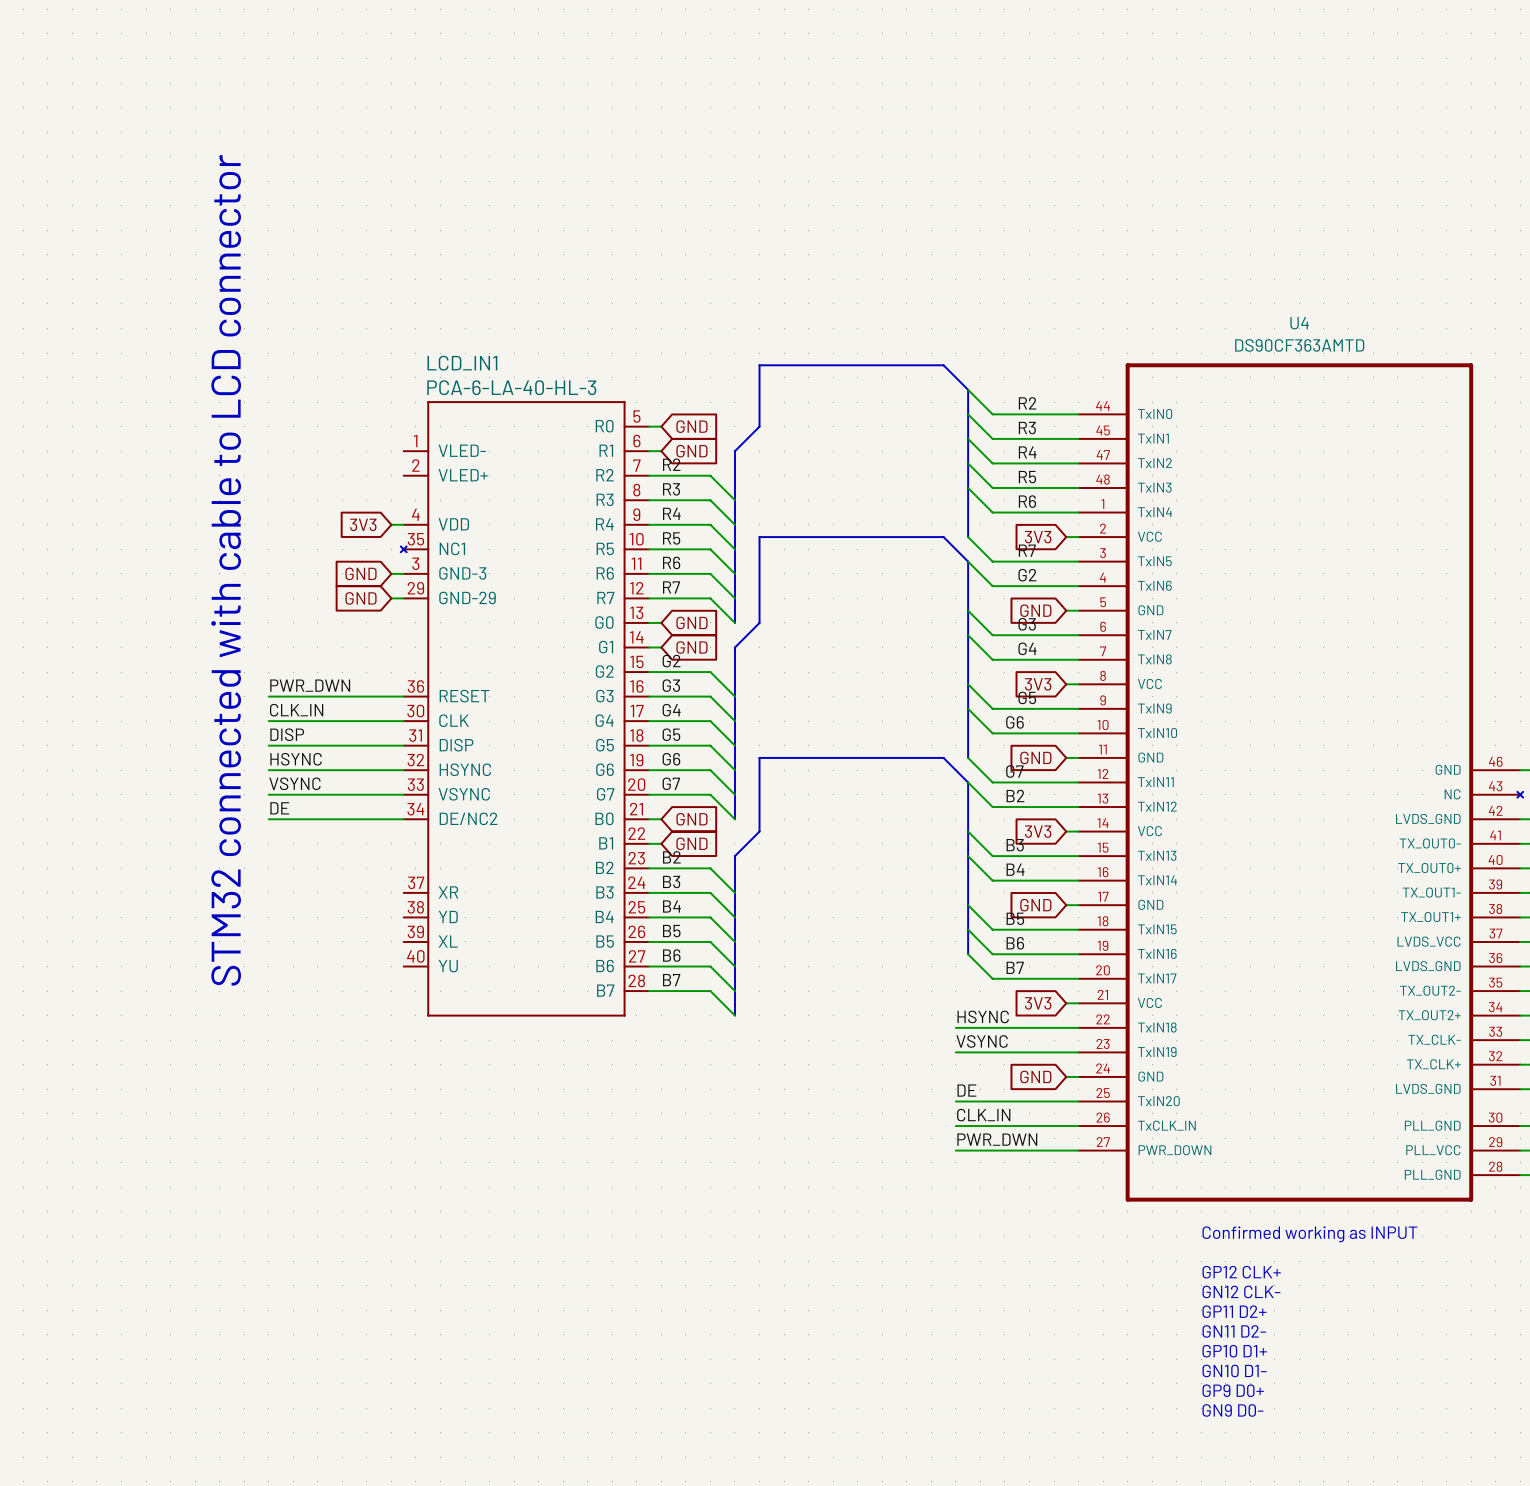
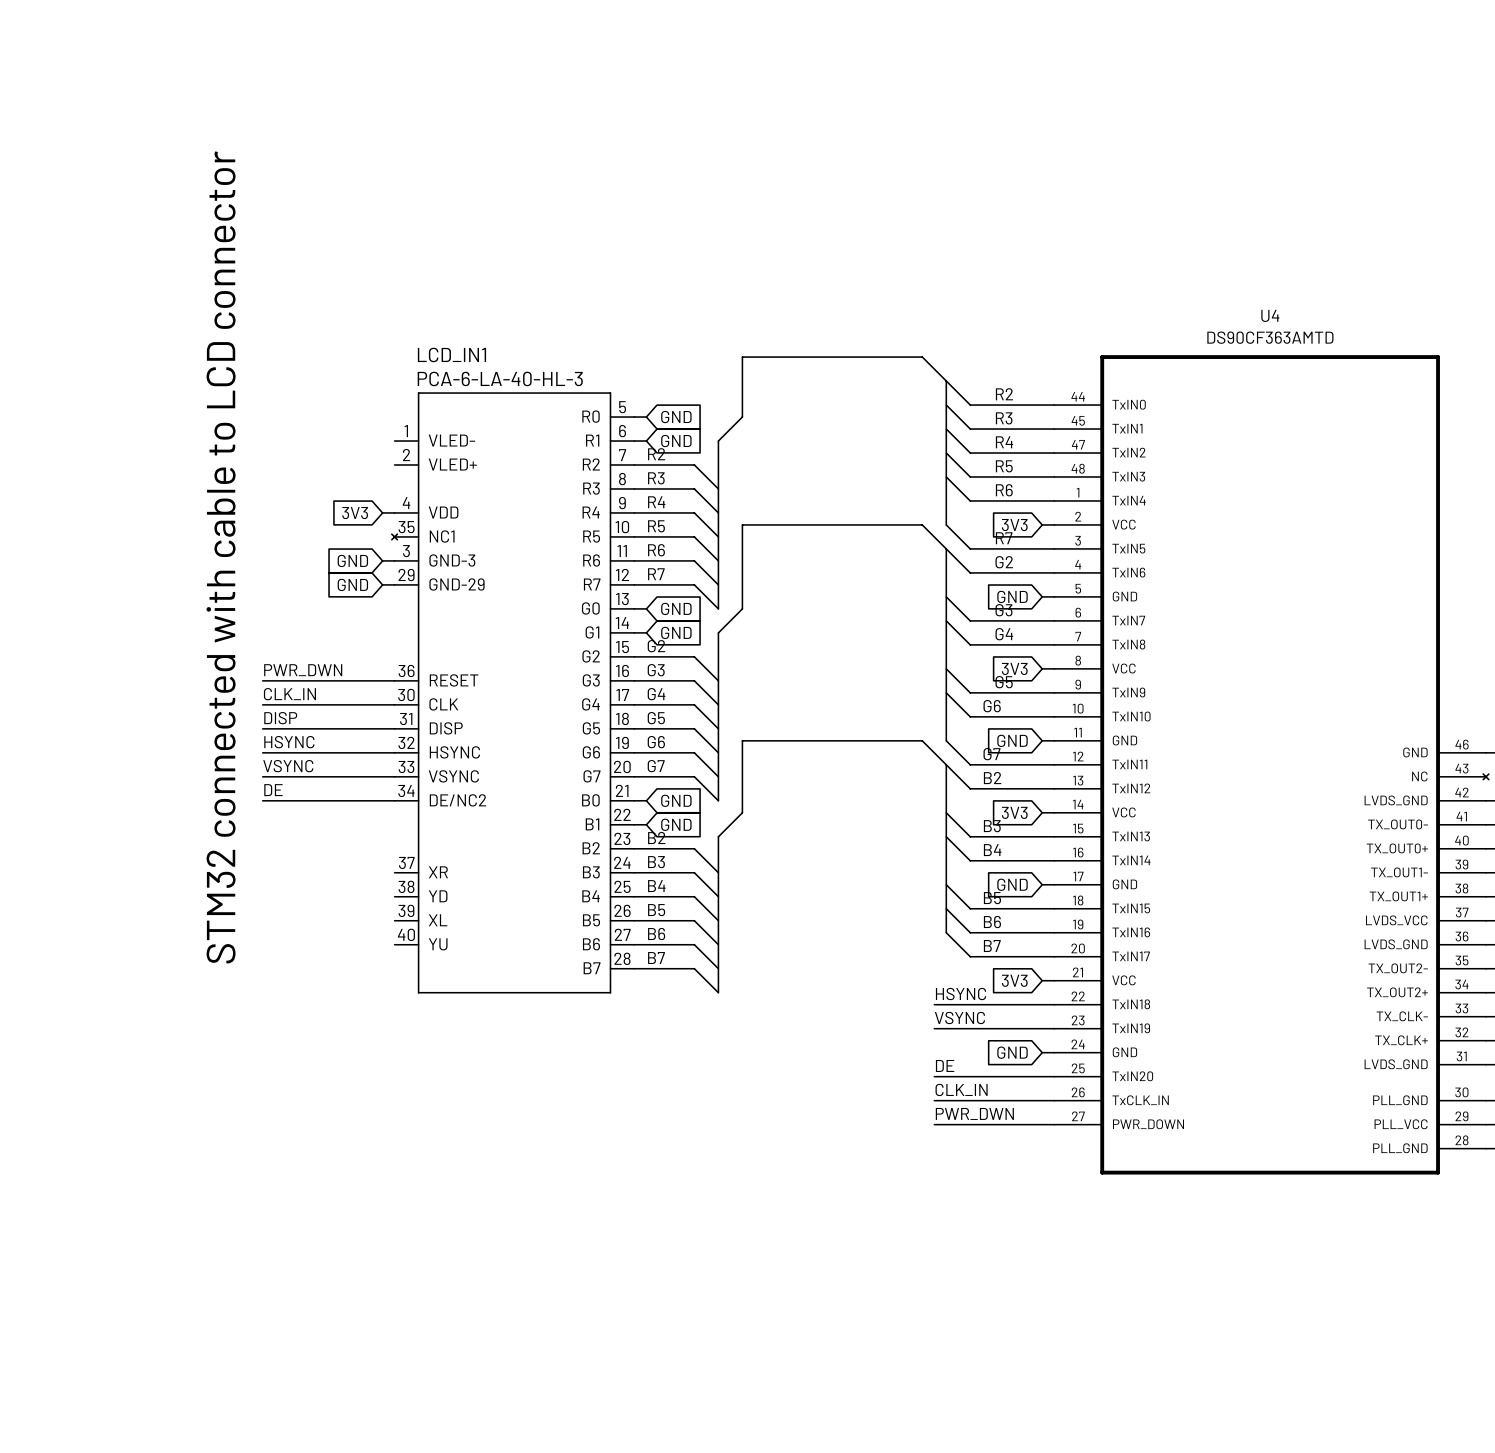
text: Confirmed working as INPUT (1309, 1234) -> none
text: GP12 CLK+ (1241, 1272) -> none
text: GN12 CLK- (1241, 1291) -> none
text: GP11 D2+ (1234, 1311) -> none
text: GN11 D2- (1234, 1331) -> none
text: GP10 D1+ (1234, 1351) -> none
text: GN10 D1- (1234, 1370) -> none
text: GP9 D0+ (1233, 1390) -> none
text: GN9 D0- (1232, 1410) -> none

